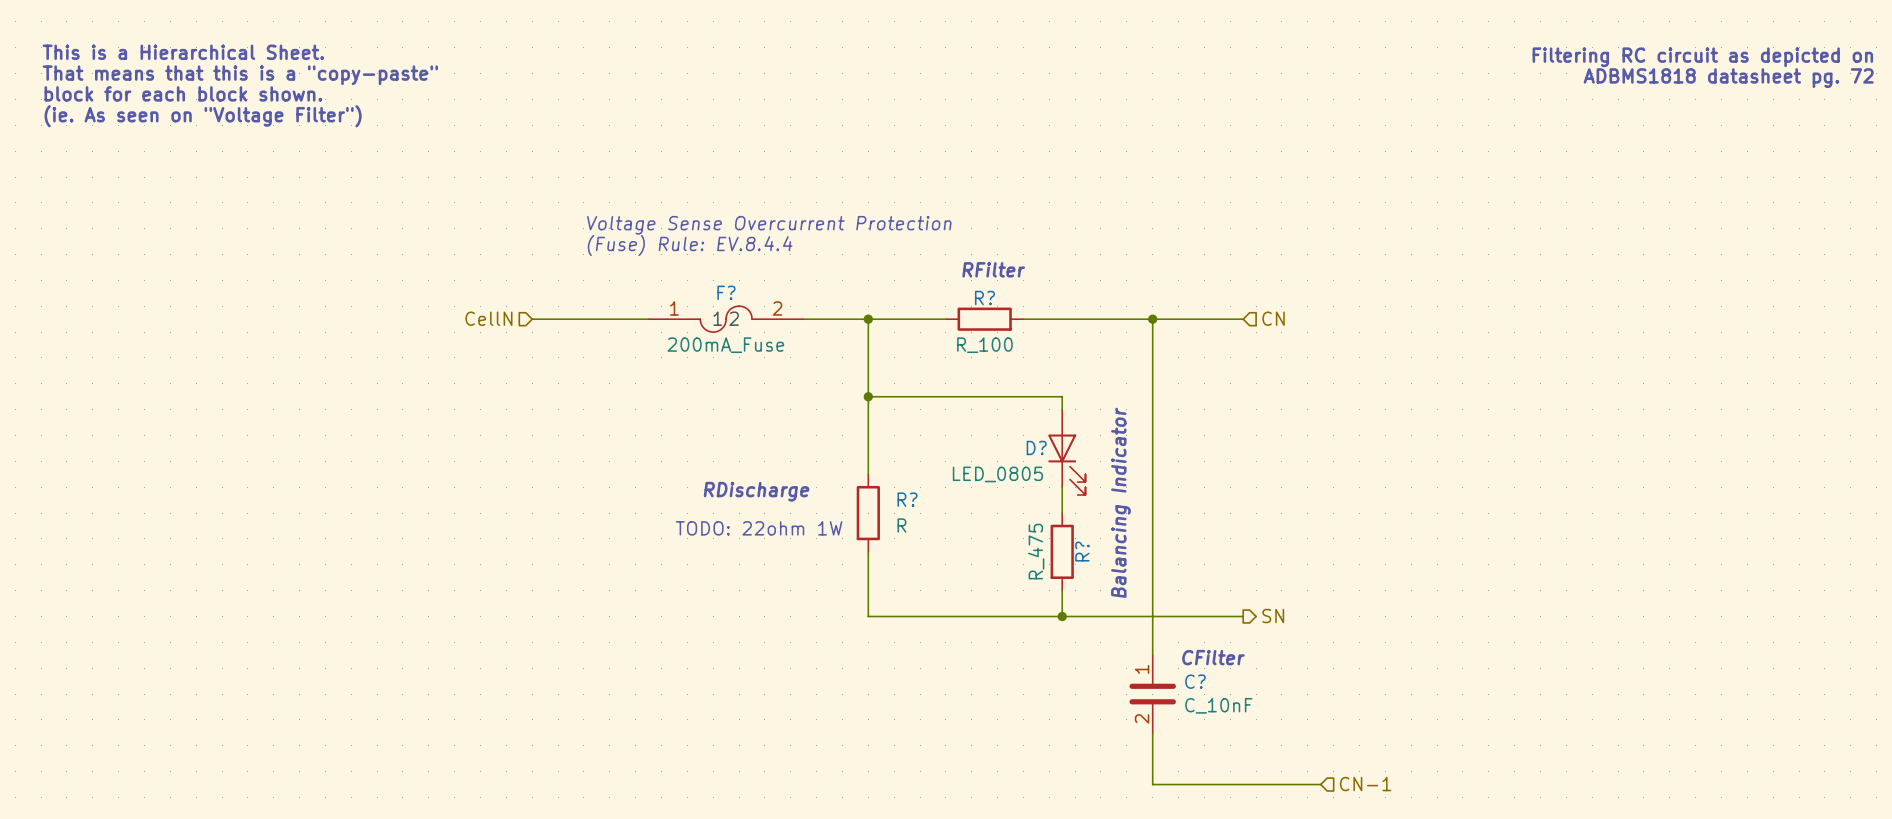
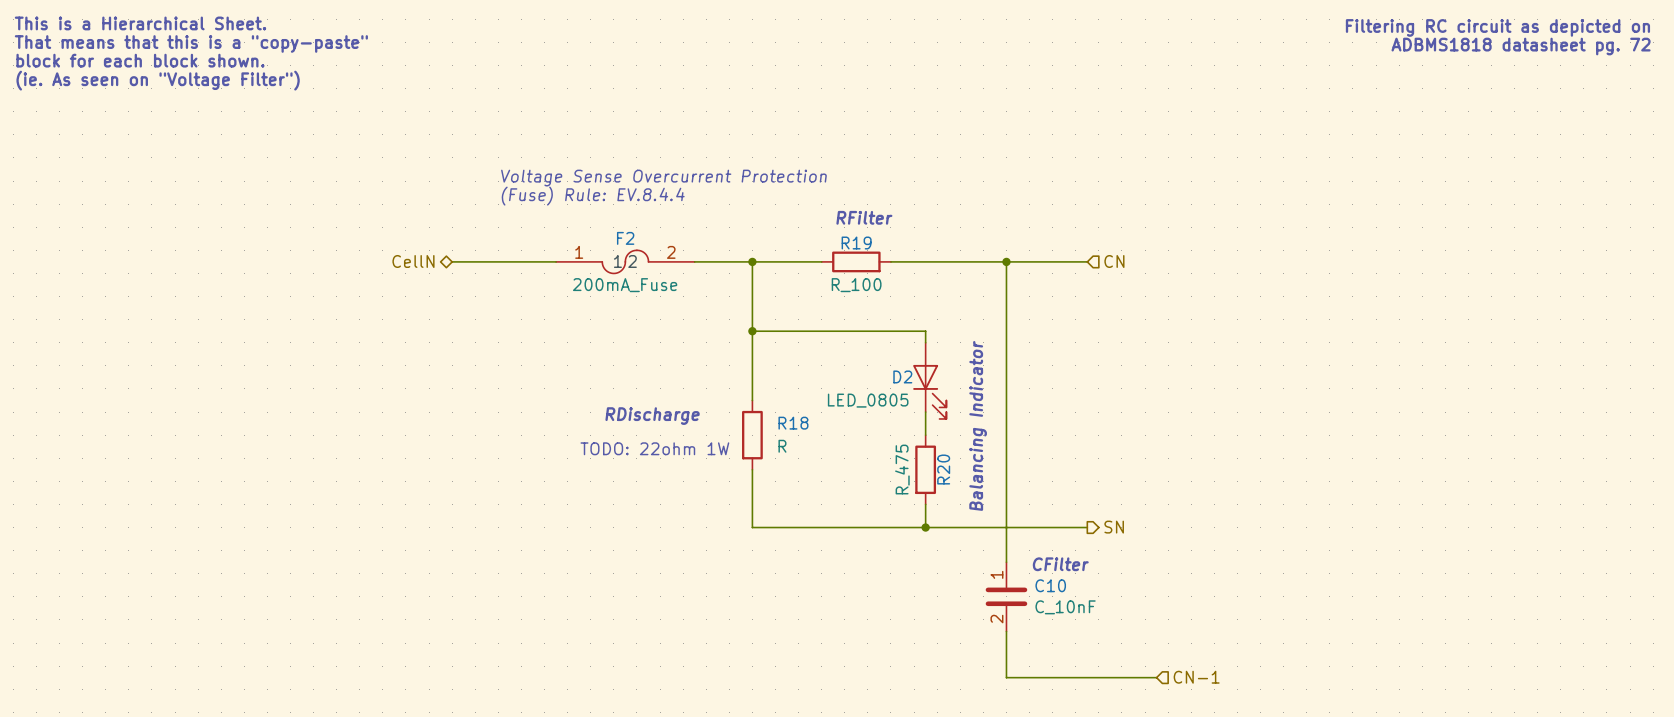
F? name: F? (726, 292) -> F2 (625, 238)
R? name: R? (984, 298) -> R19 (856, 243)
hierarchical label shape: input (488, 318) -> bidirectional (413, 261)
D? name: D? (1036, 447) -> D2 (902, 376)
R? name: R? (907, 499) -> R18 (793, 423)
R? name: R? (1082, 551) -> R20 (943, 469)
C? name: C? (1195, 681) -> C10 (1050, 585)

